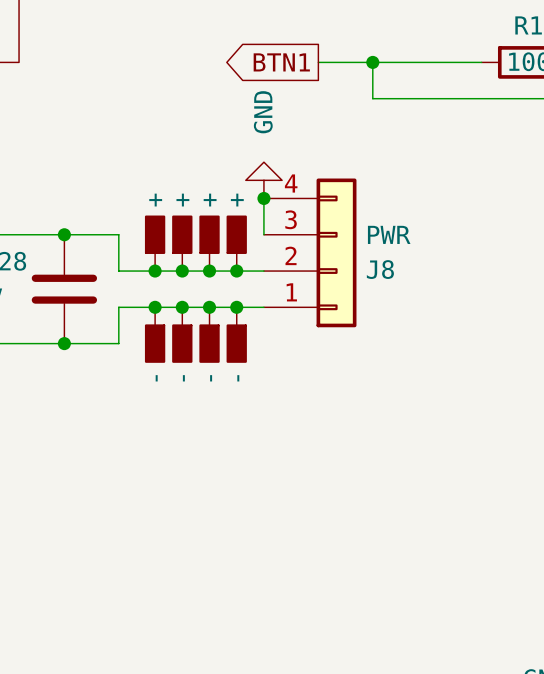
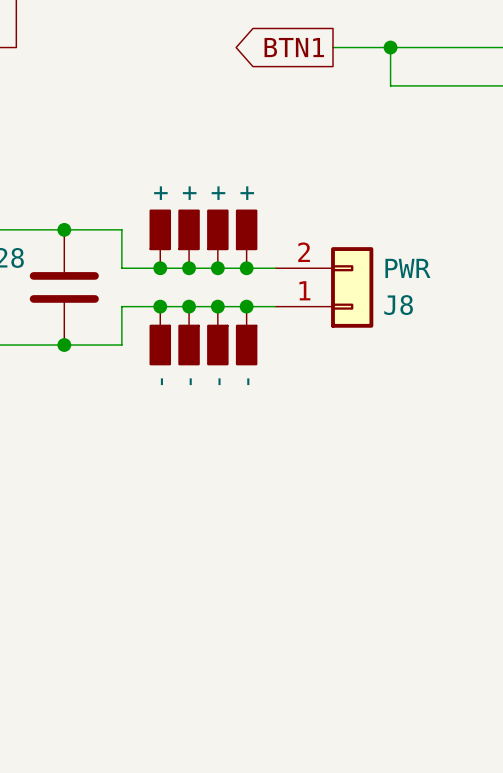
J8 symbol: [263, 178, 357, 328] -> [275, 247, 374, 328]
power symbol: GND (263, 180) -> none
wire: (263, 198) (263, 234) -> none
junction: (263, 198) -> none

